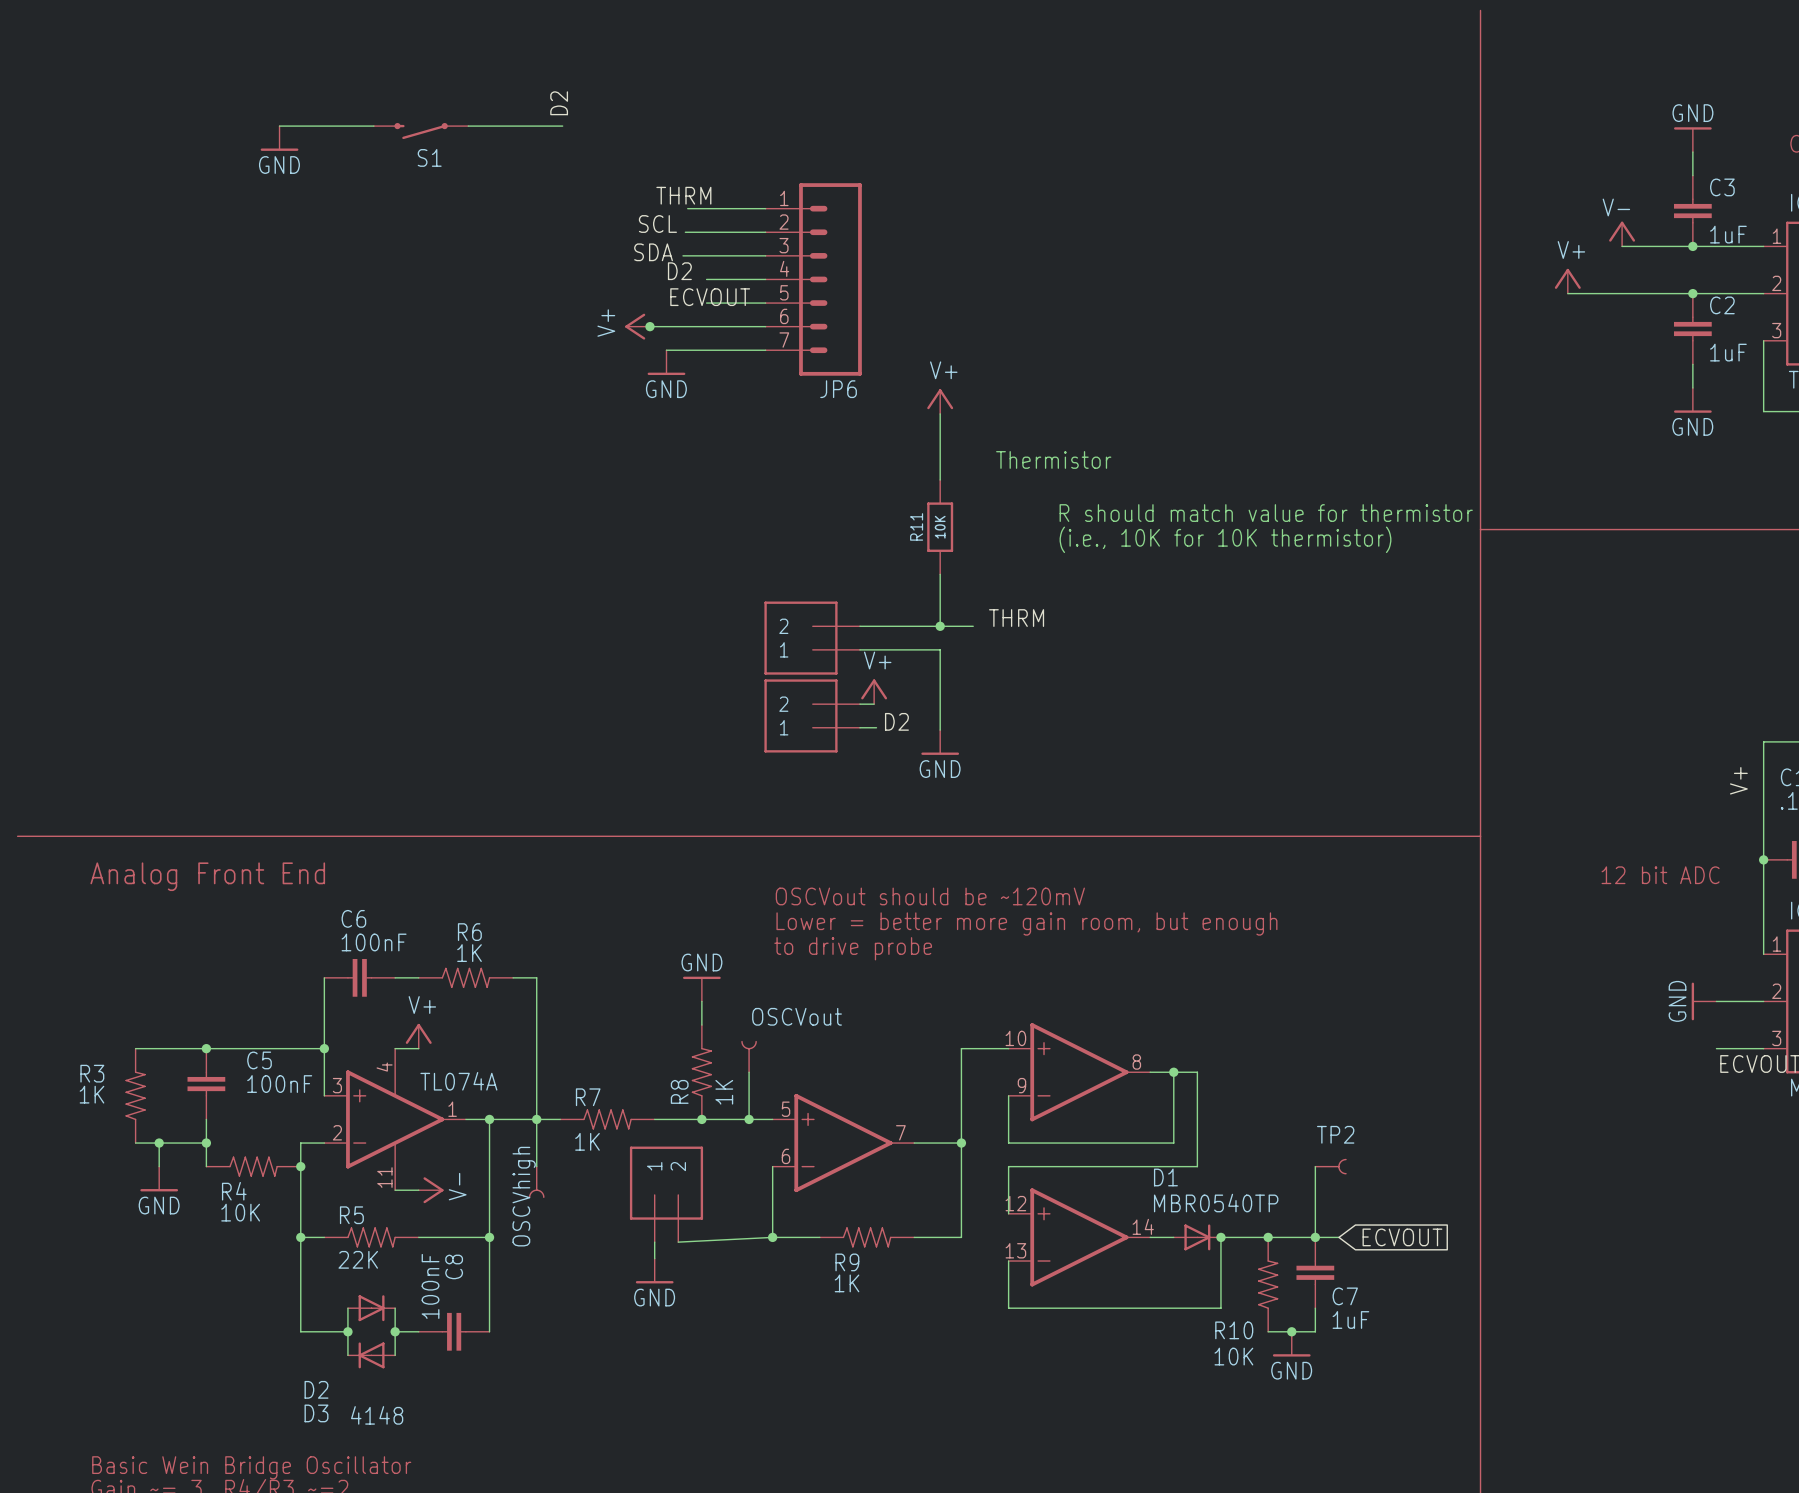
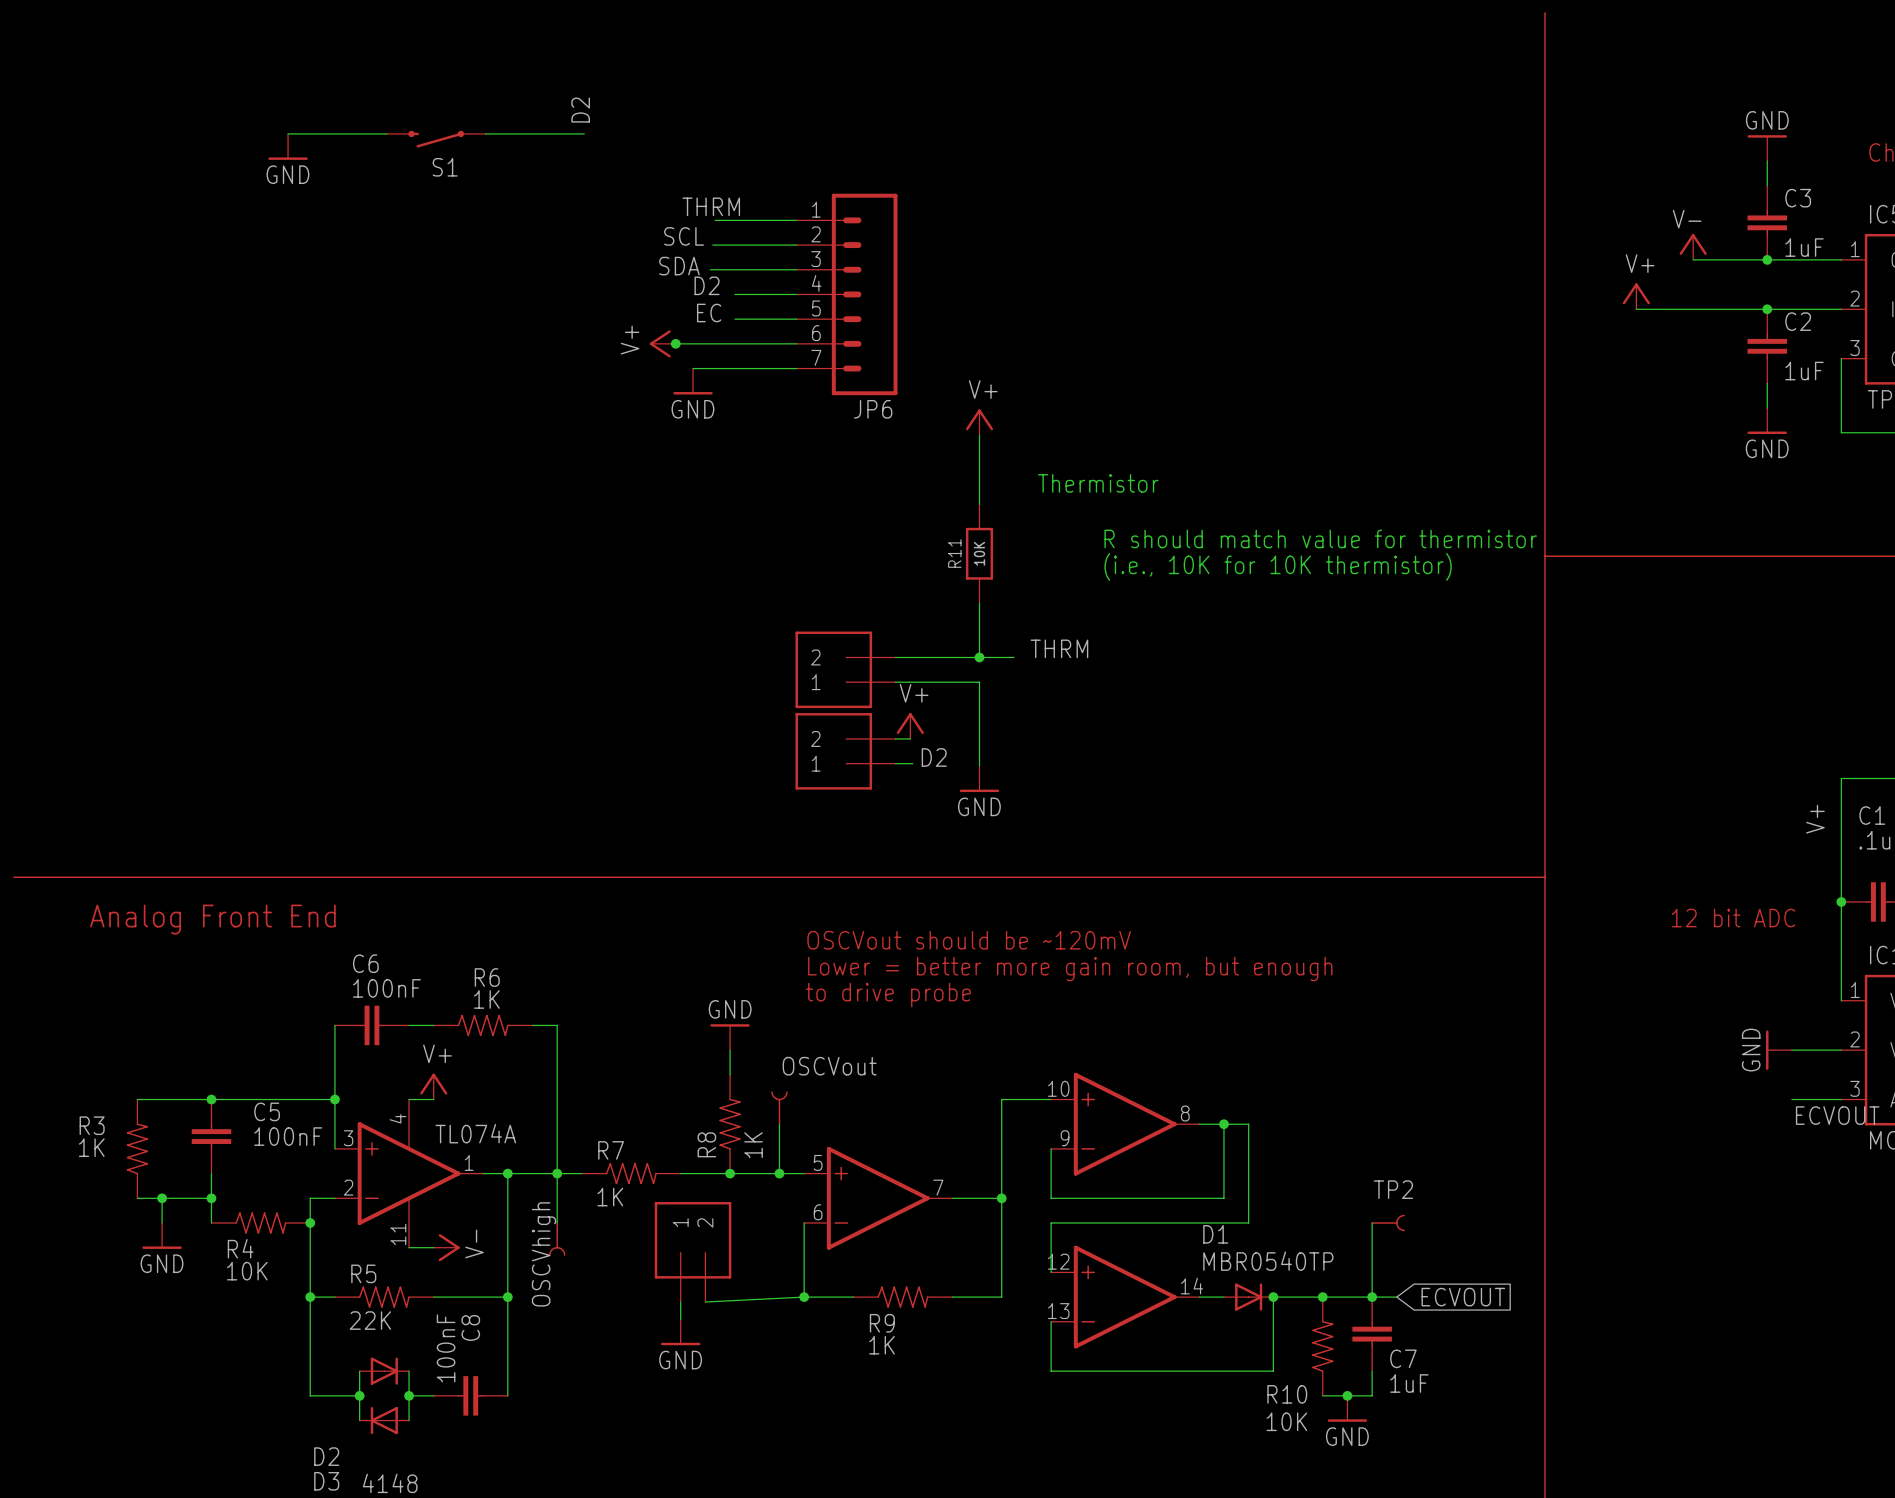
label: ECVOUT (710, 297) -> EC (709, 312)

